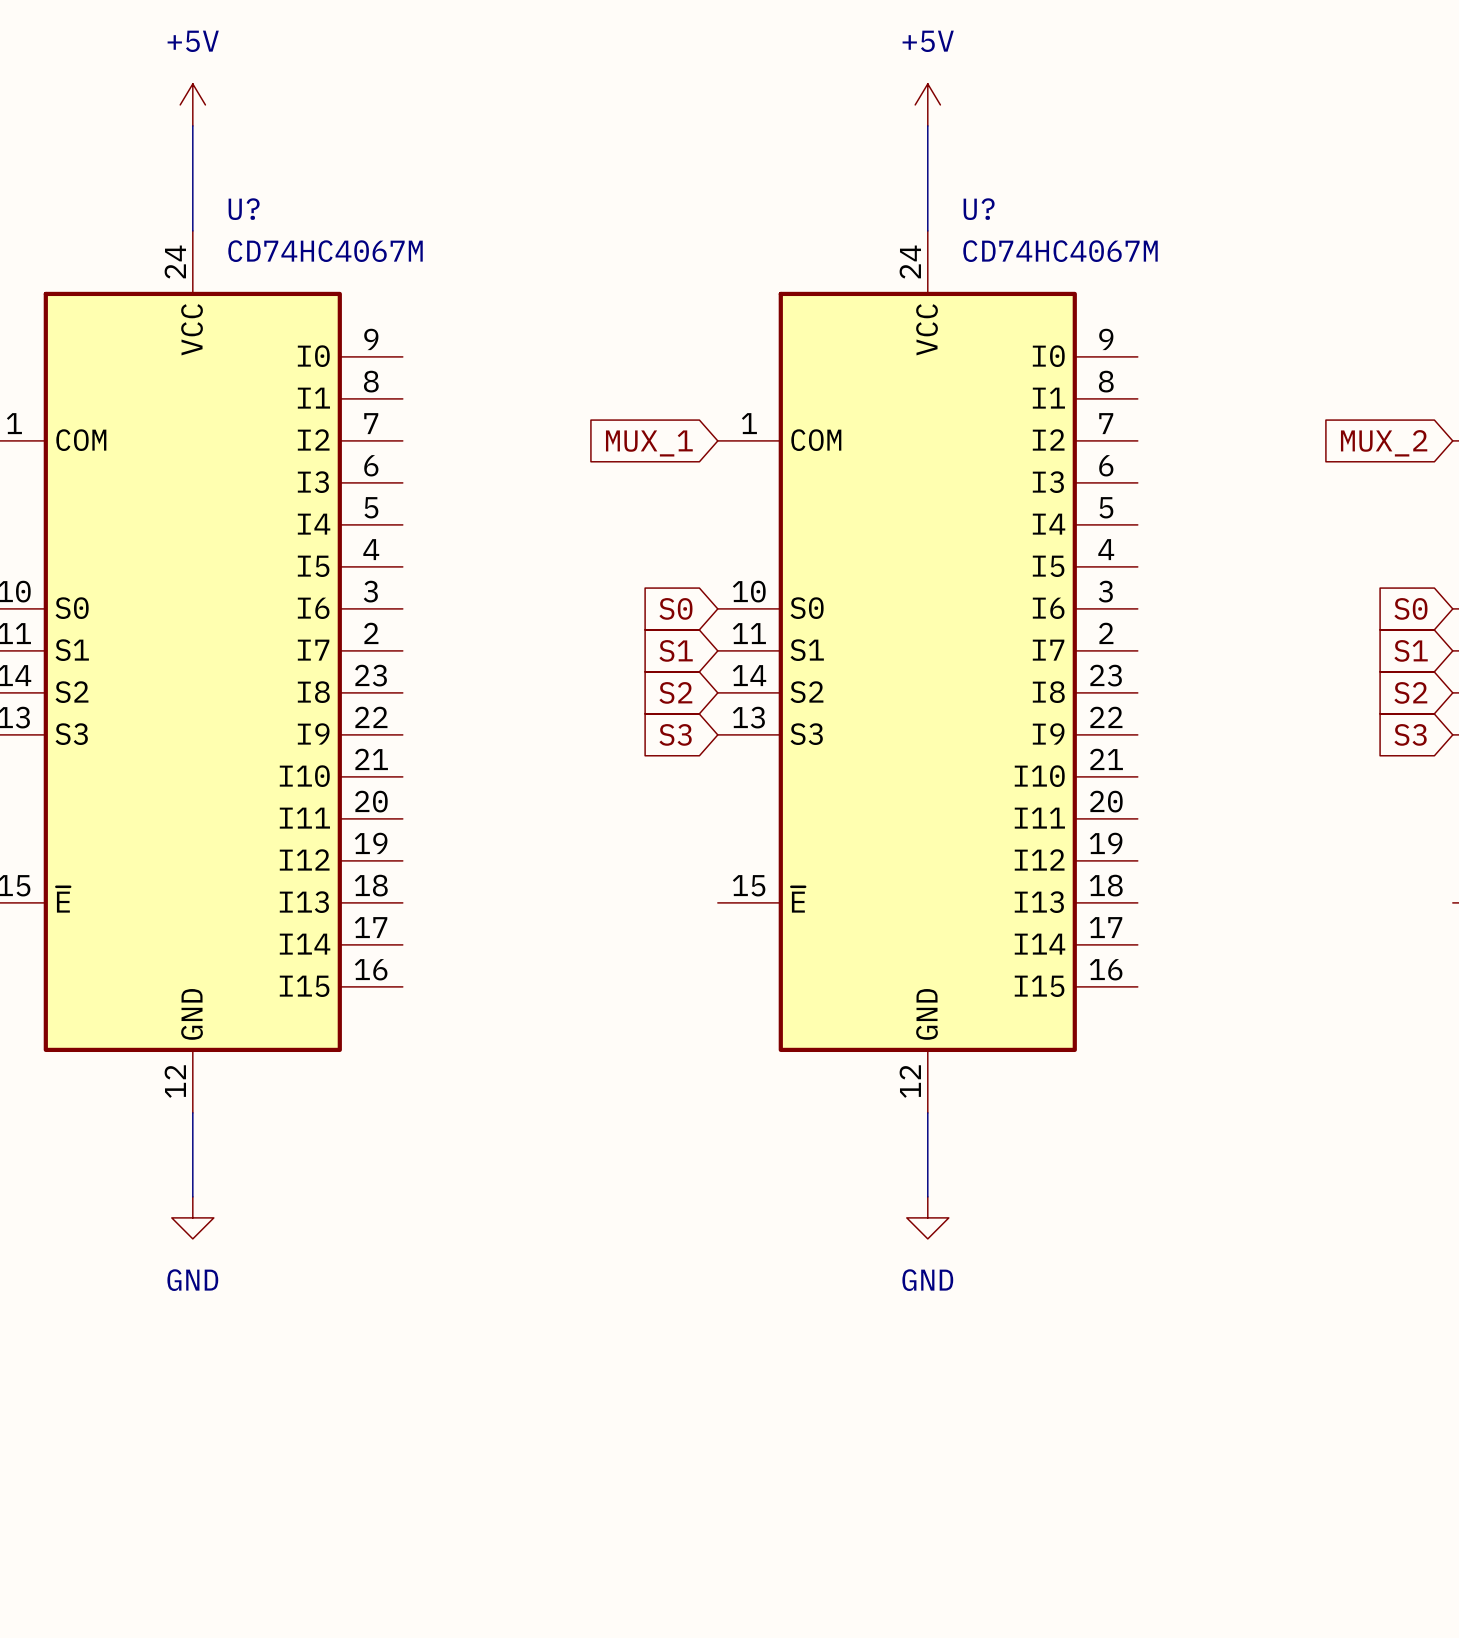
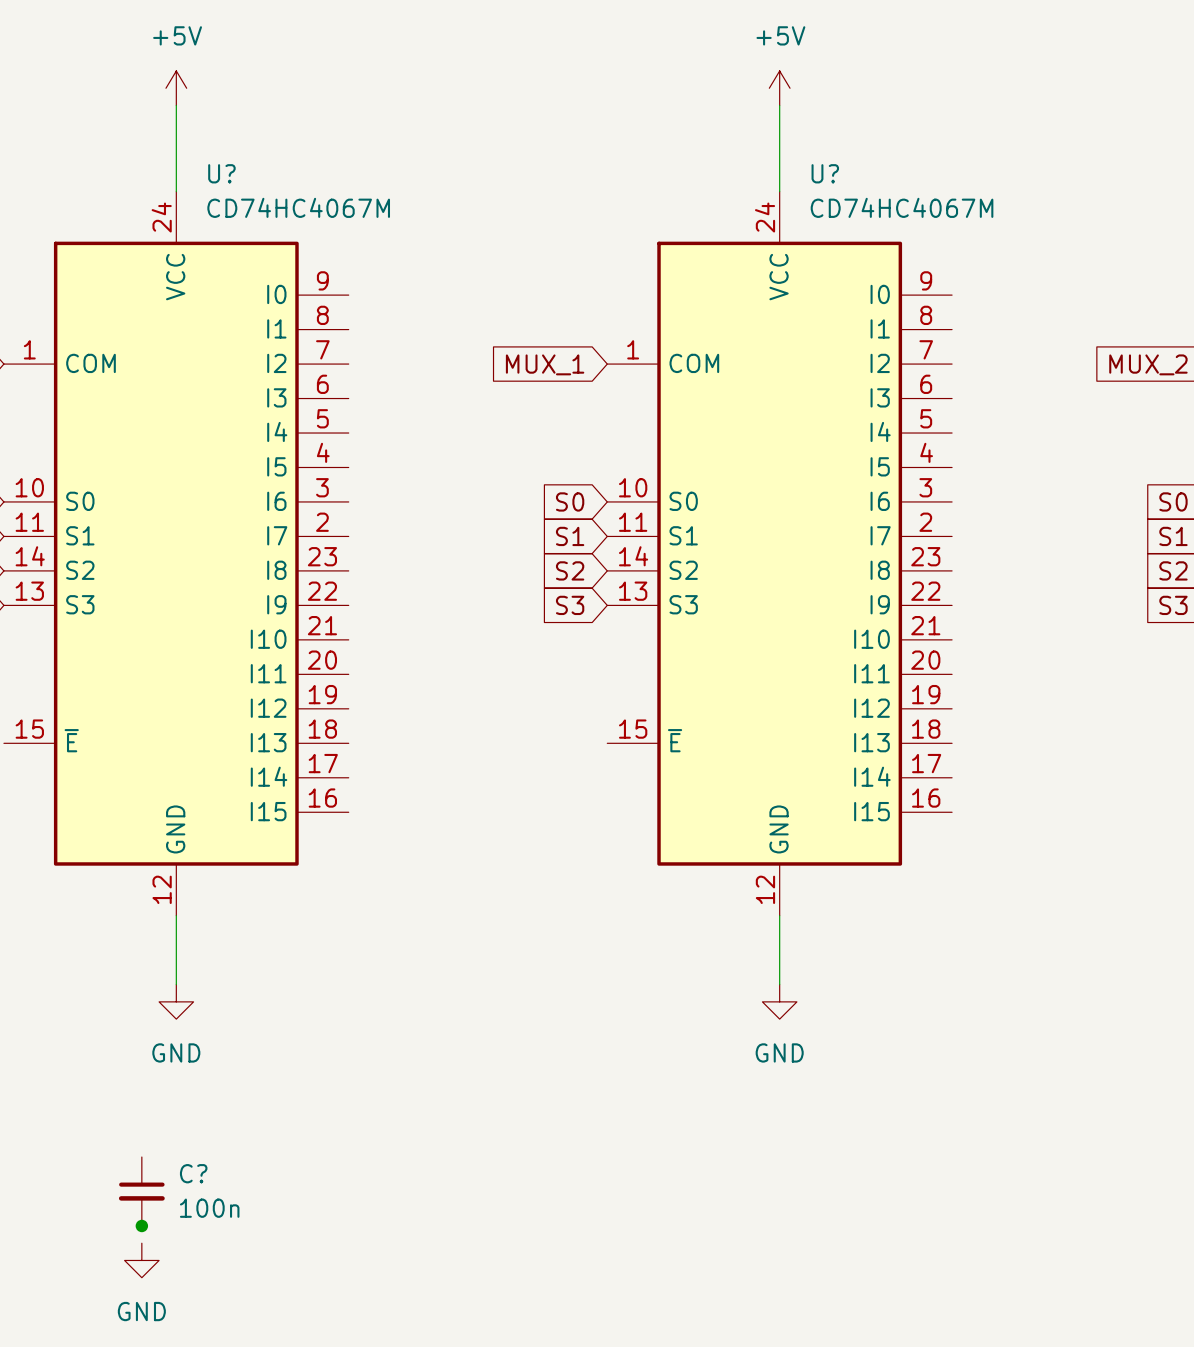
C?: none -> 100n (141, 1191)
junction: none -> (141, 1225)
power symbol: none -> GND (141, 1260)

